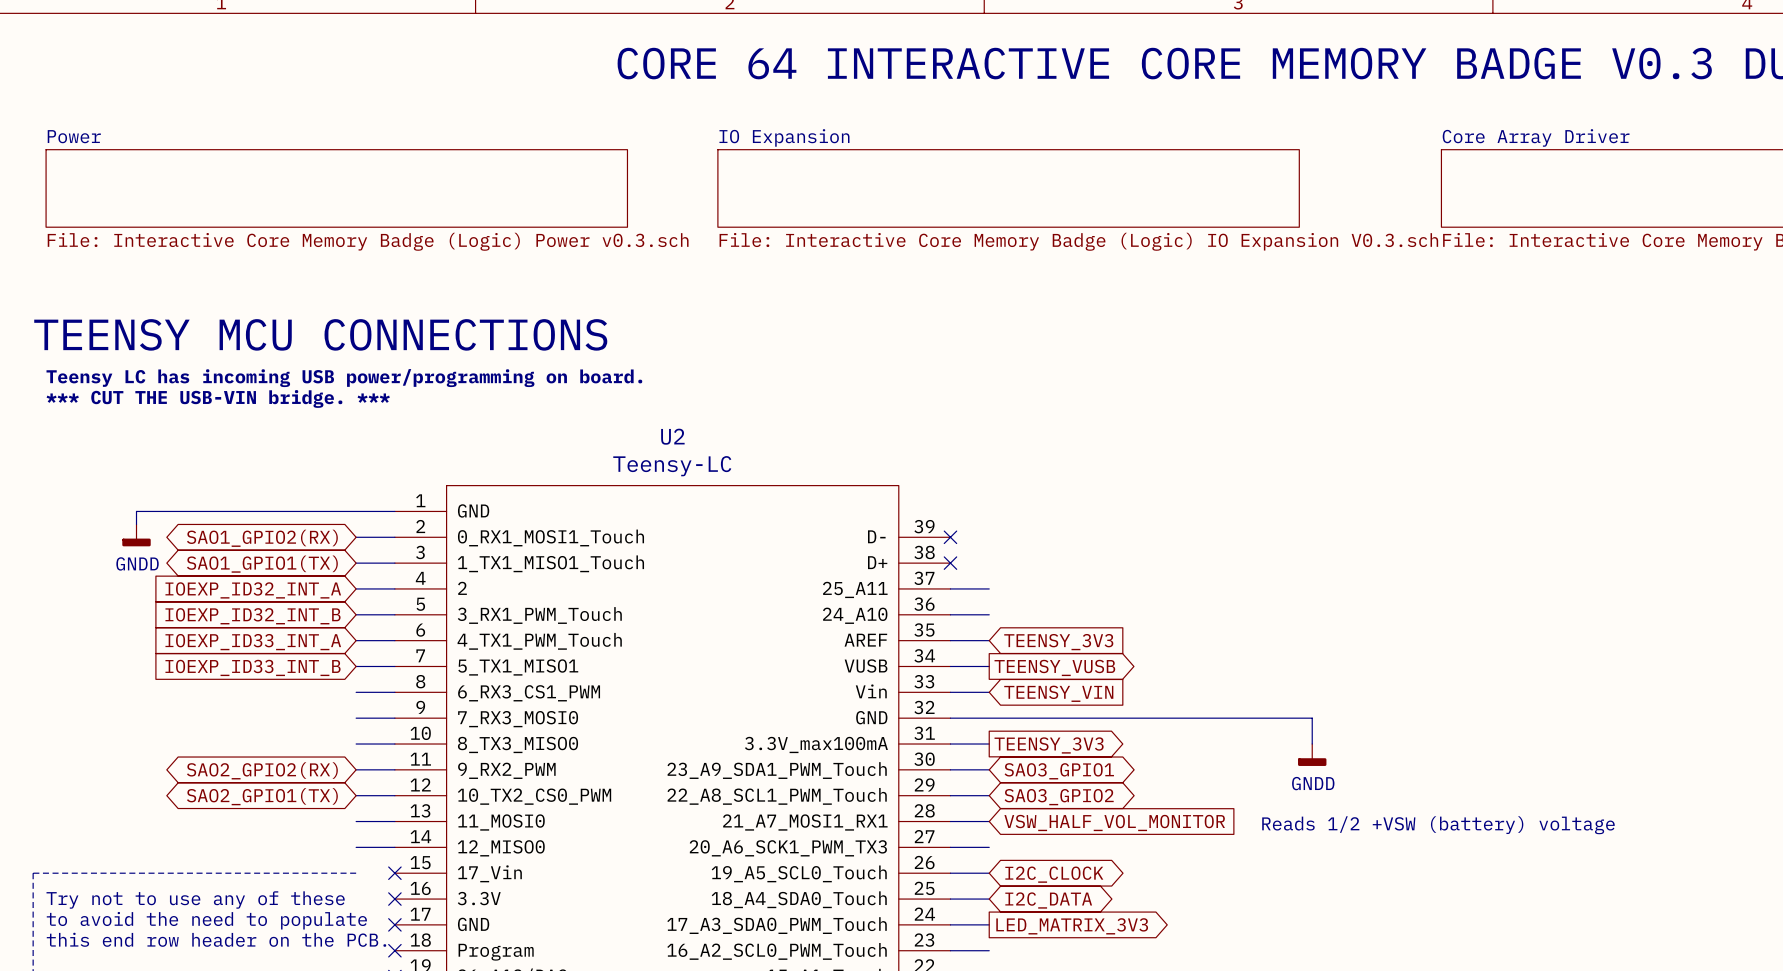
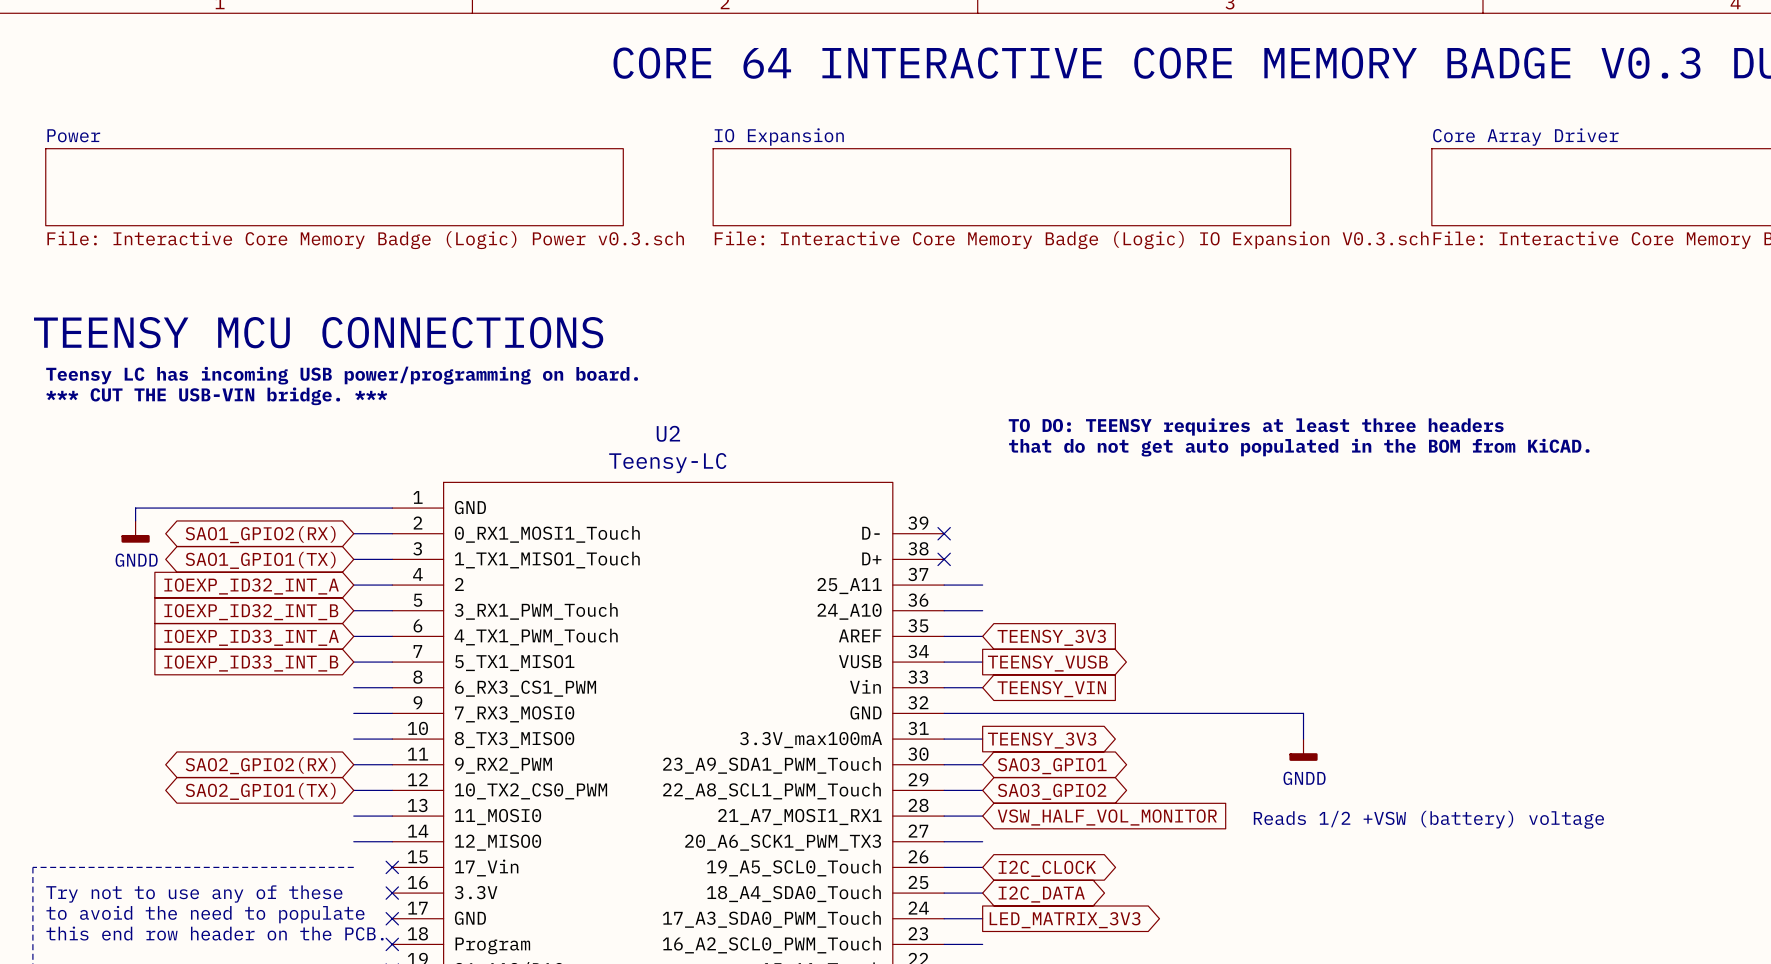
text: none -> TO DO: TEENSY requires at least three headers (1256, 426)
text: none -> that do not get auto populated in the BOM from KiCAD. (1299, 447)

